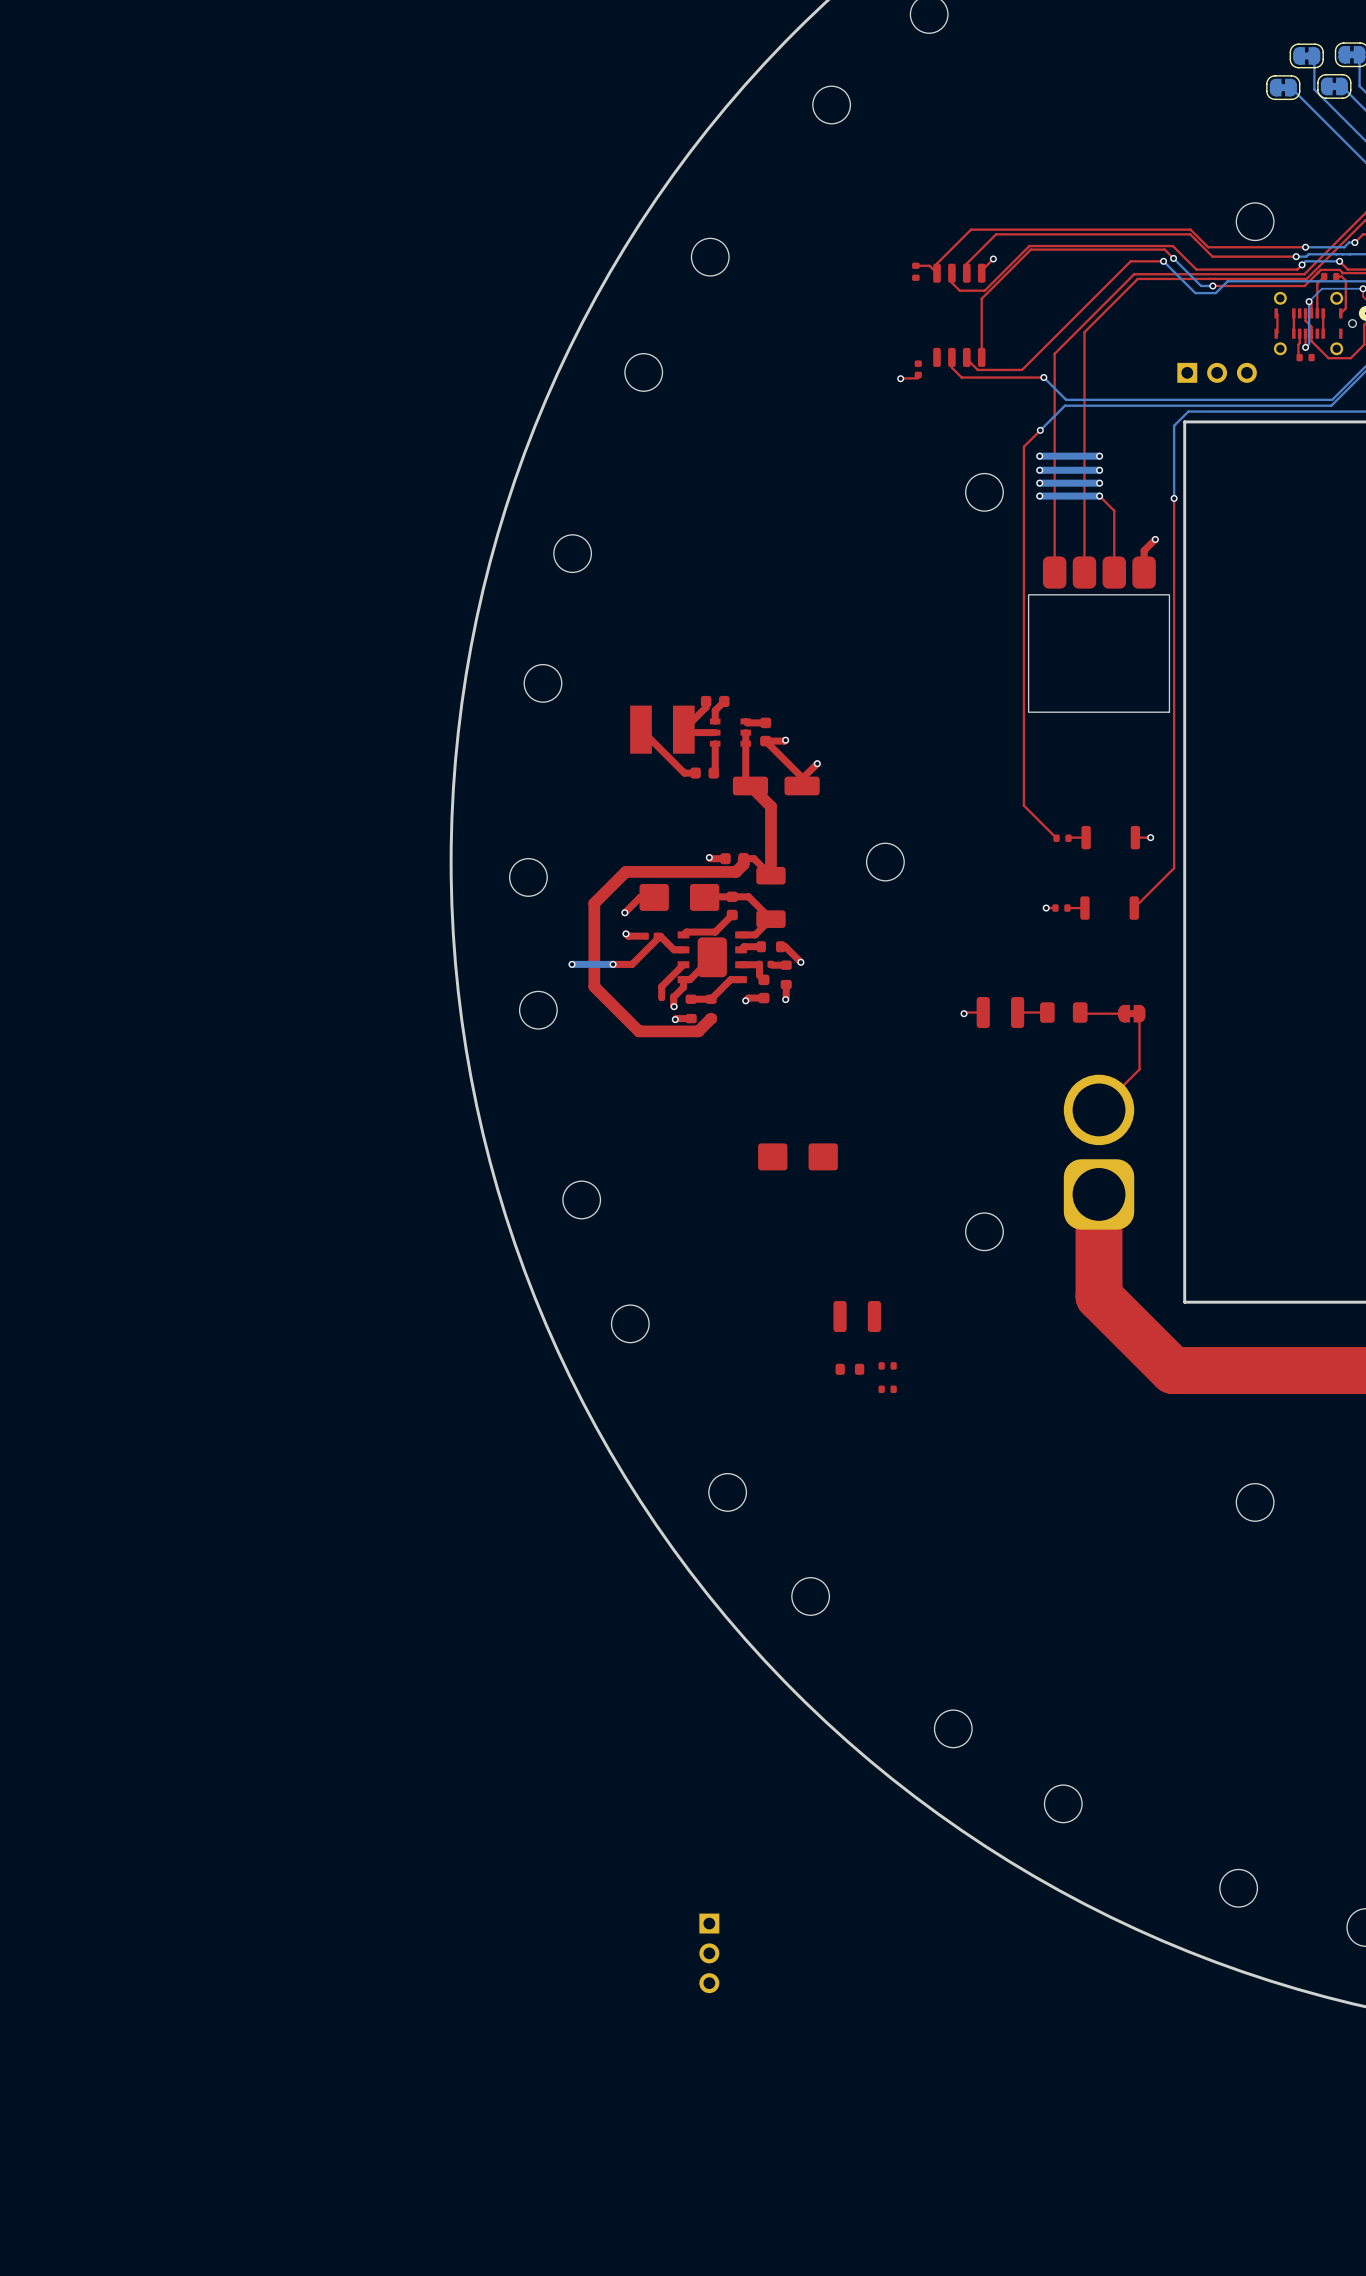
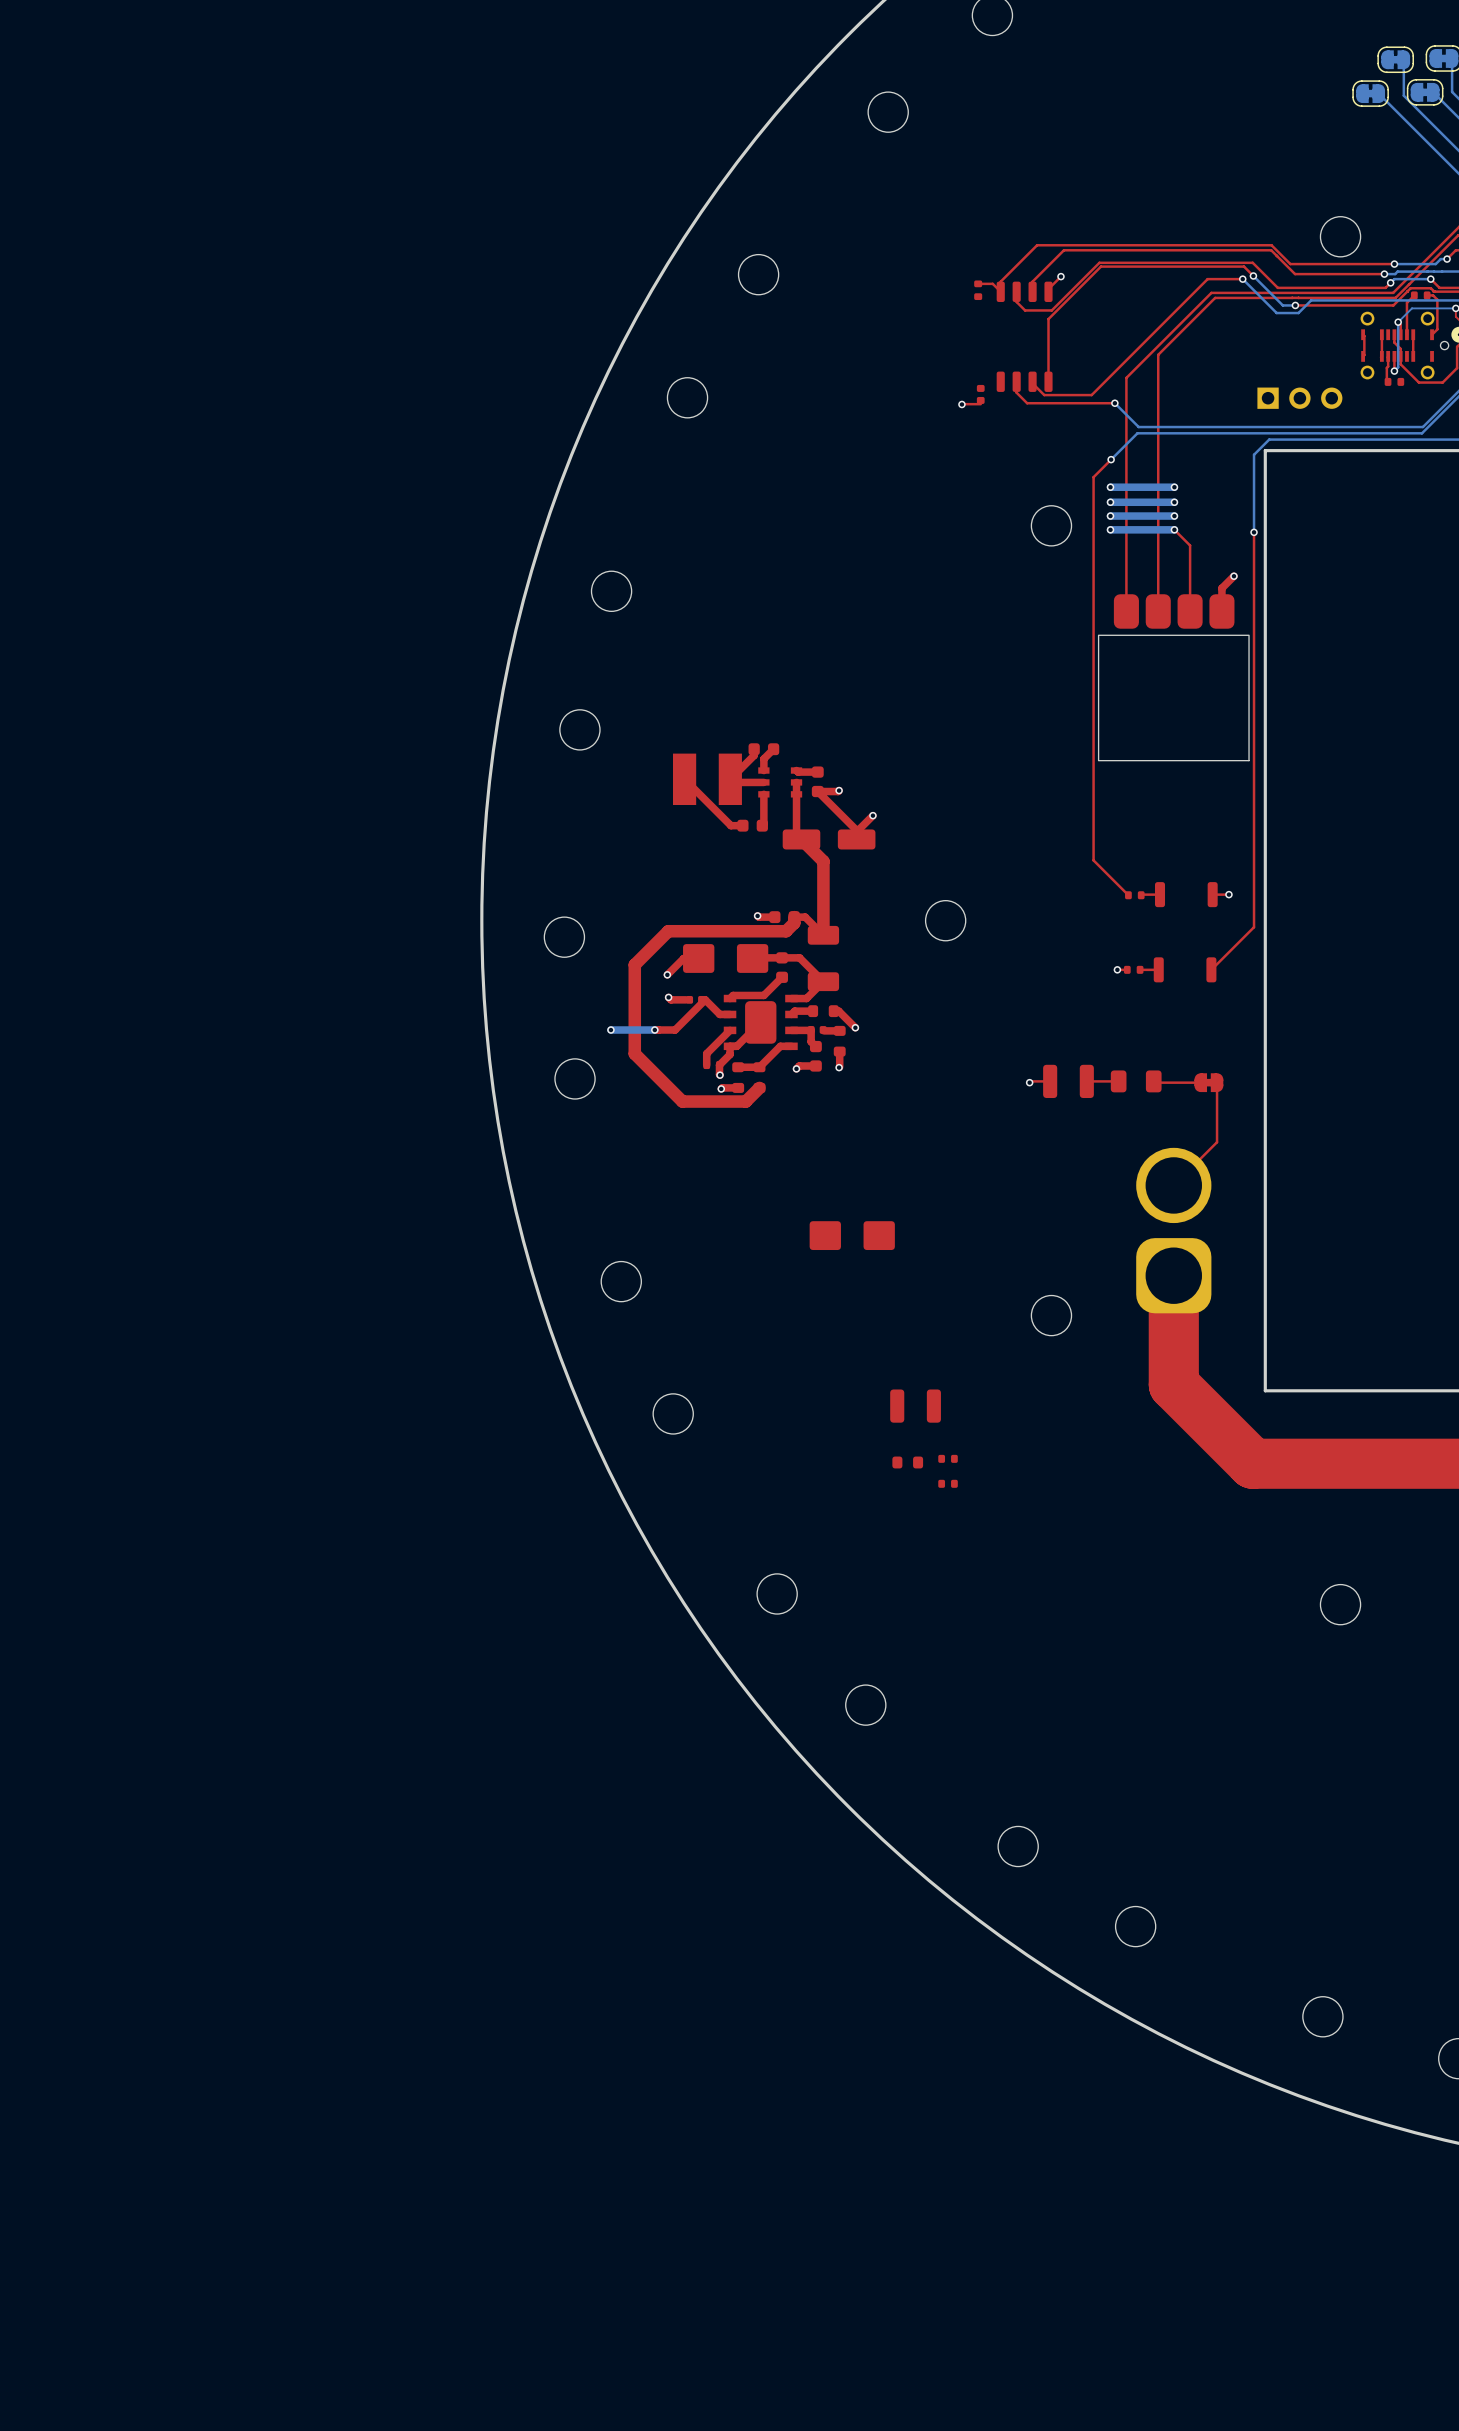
part: (709, 1953) -> none

